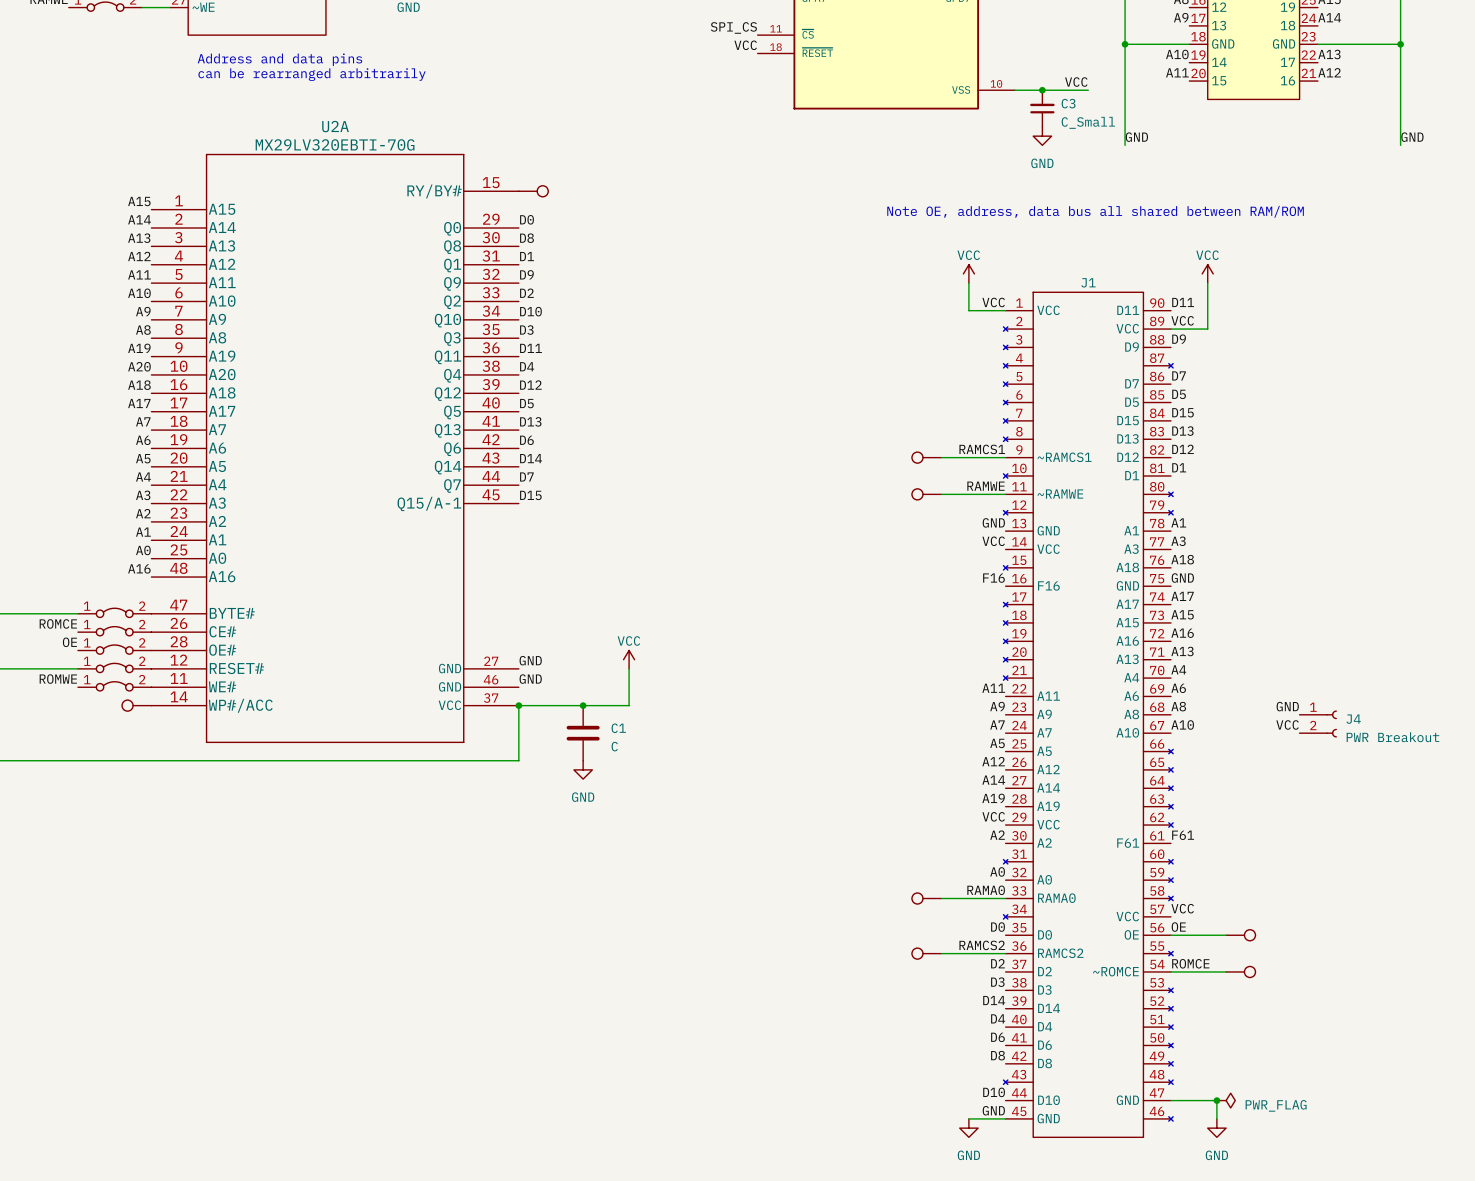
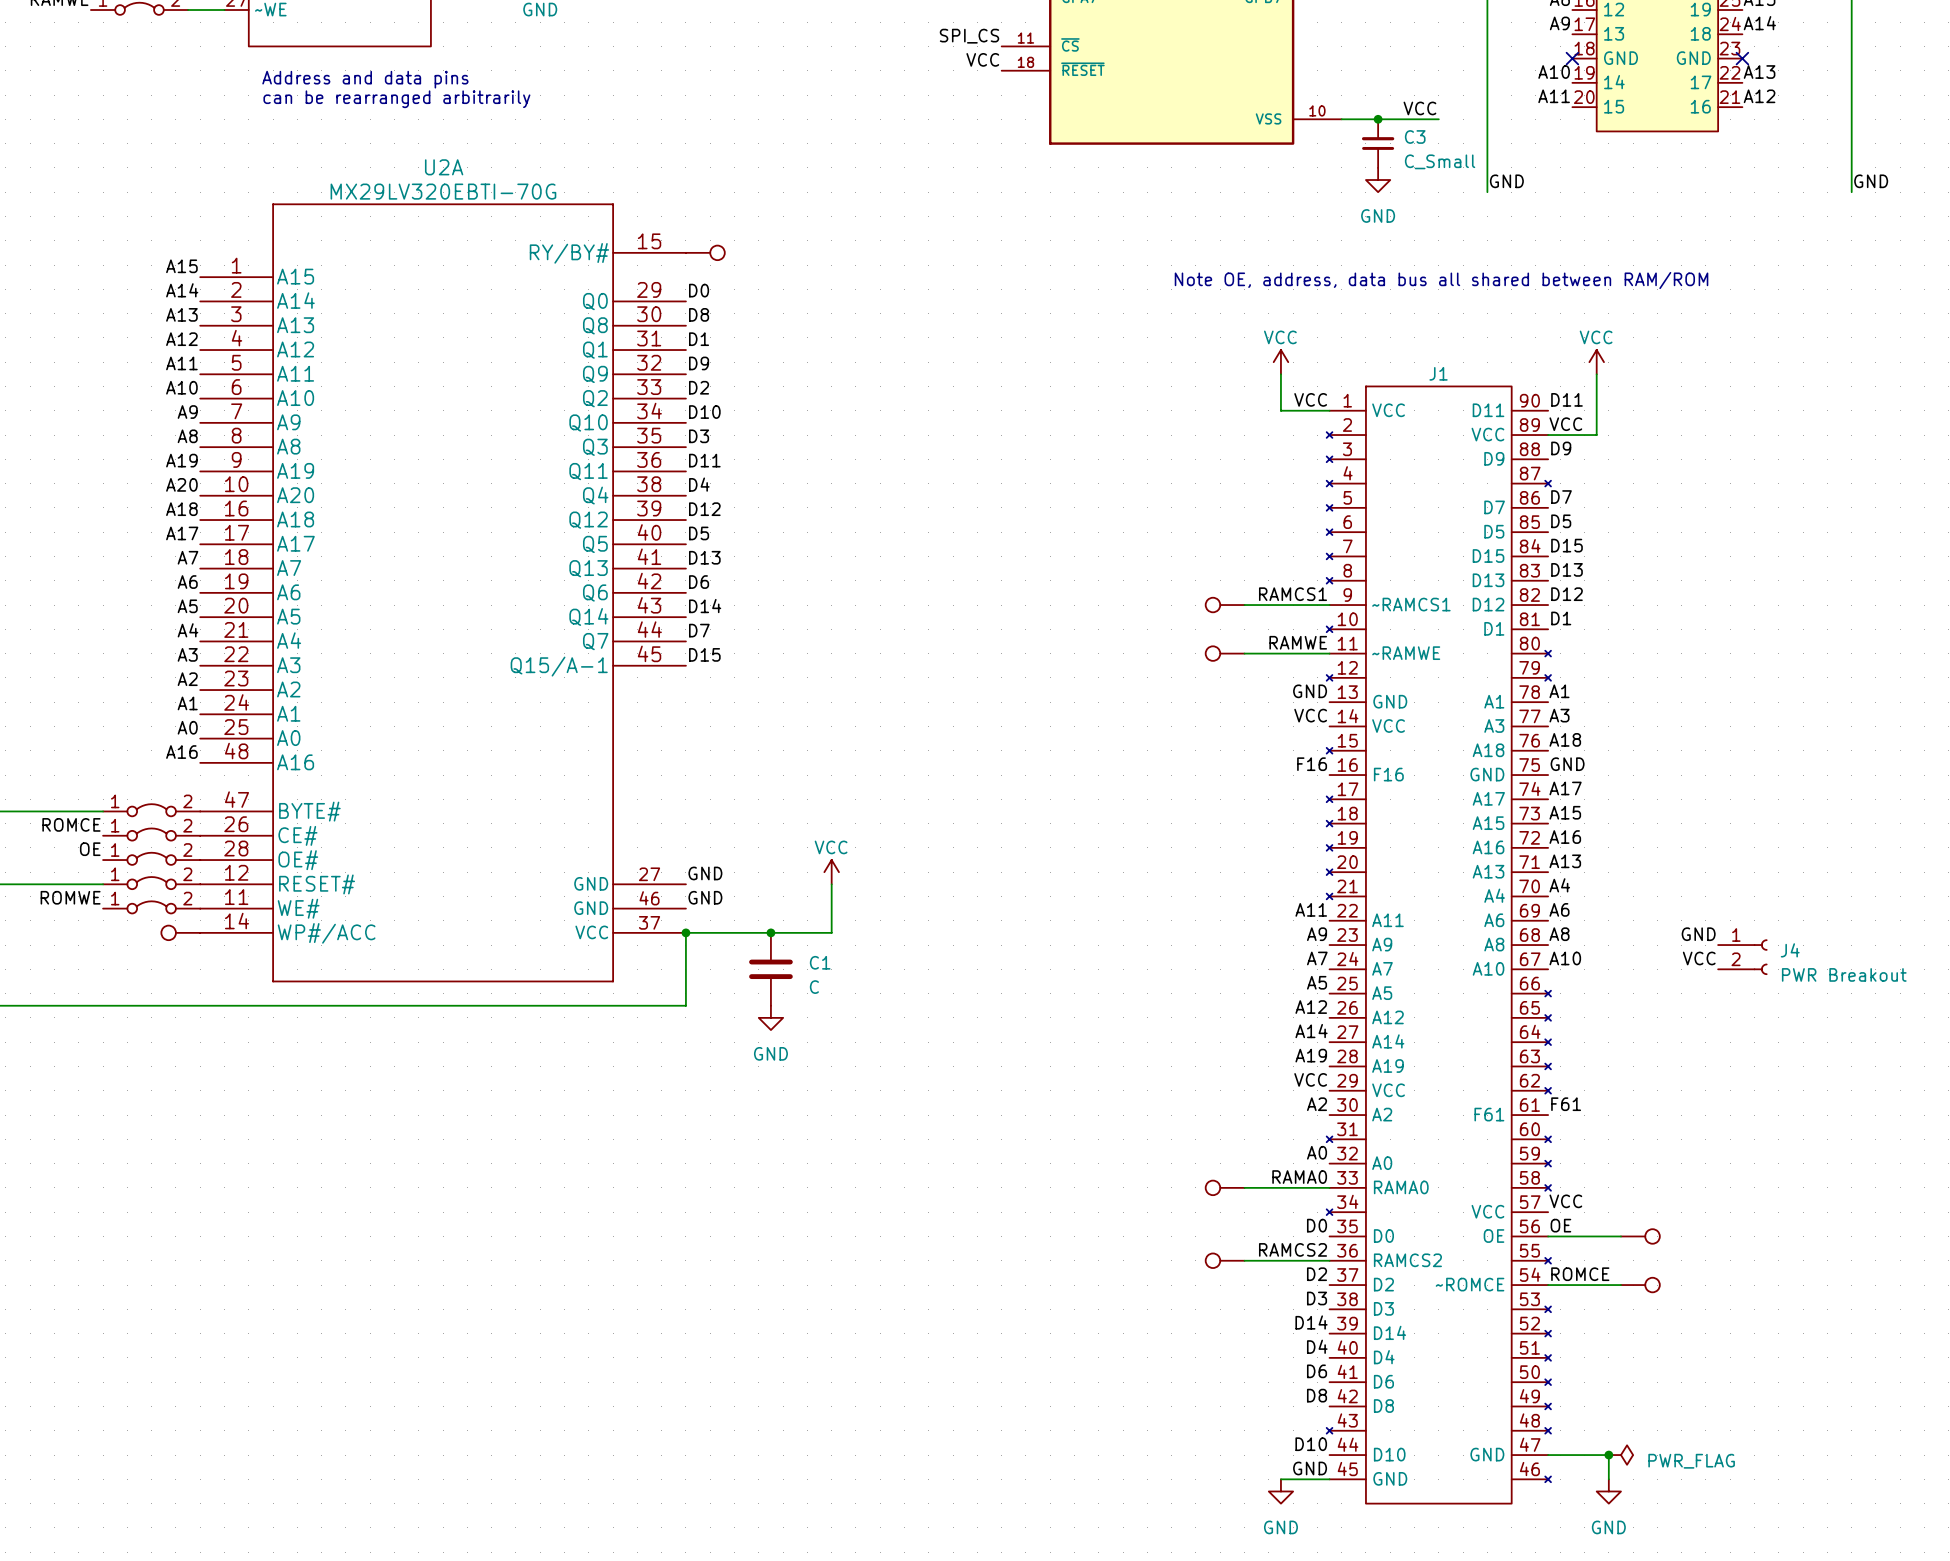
wire: (1125, 44) (1189, 44) -> none
junction: (1125, 44) -> none
no-connect mark: none -> (1572, 58)
wire: (1317, 44) (1400, 44) -> none
no-connect mark: none -> (1742, 58)
junction: (1400, 44) -> none

